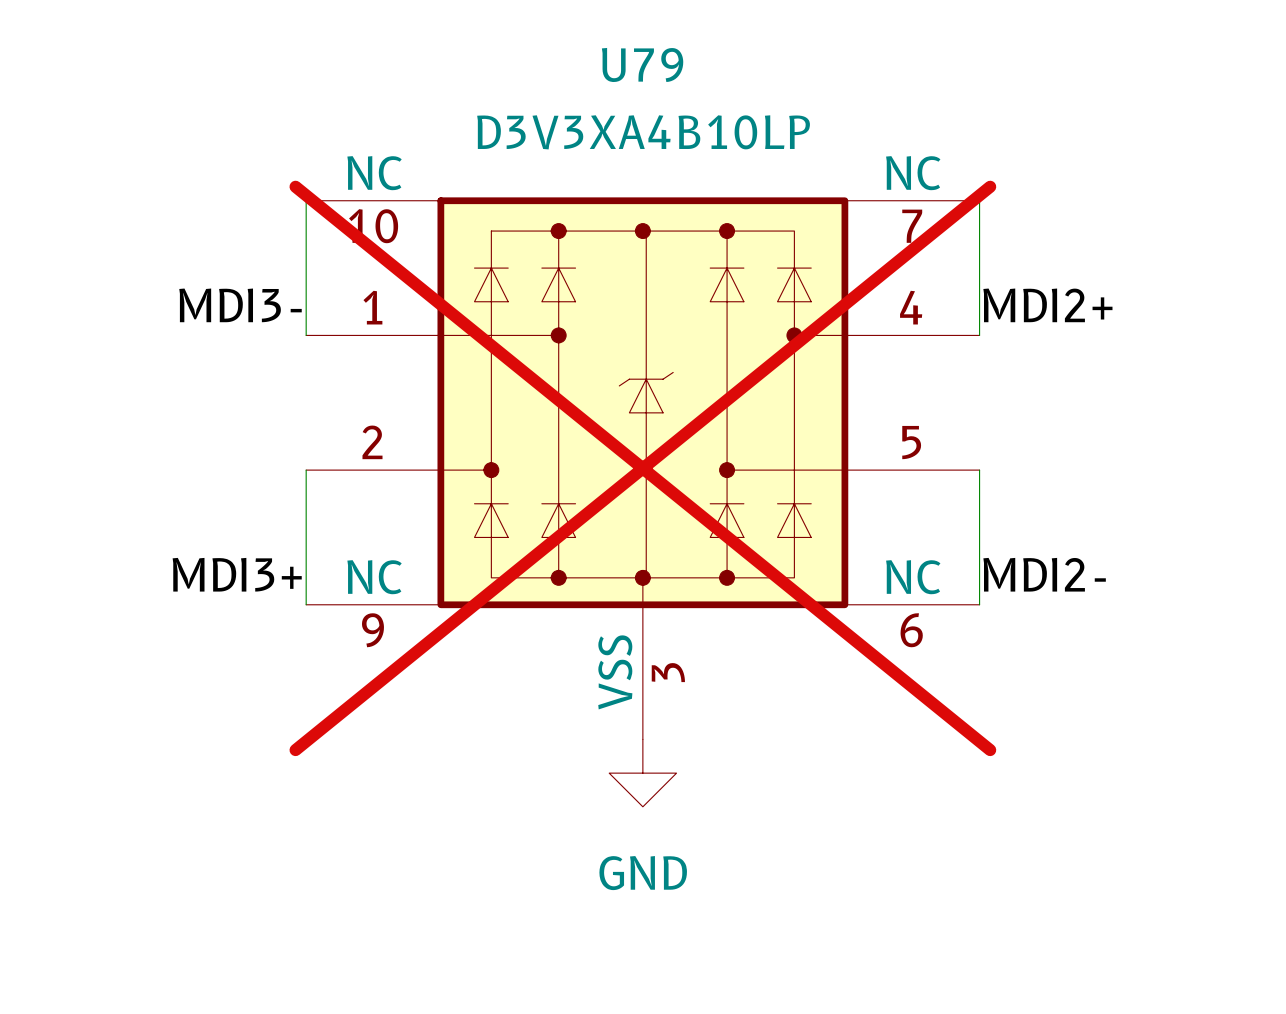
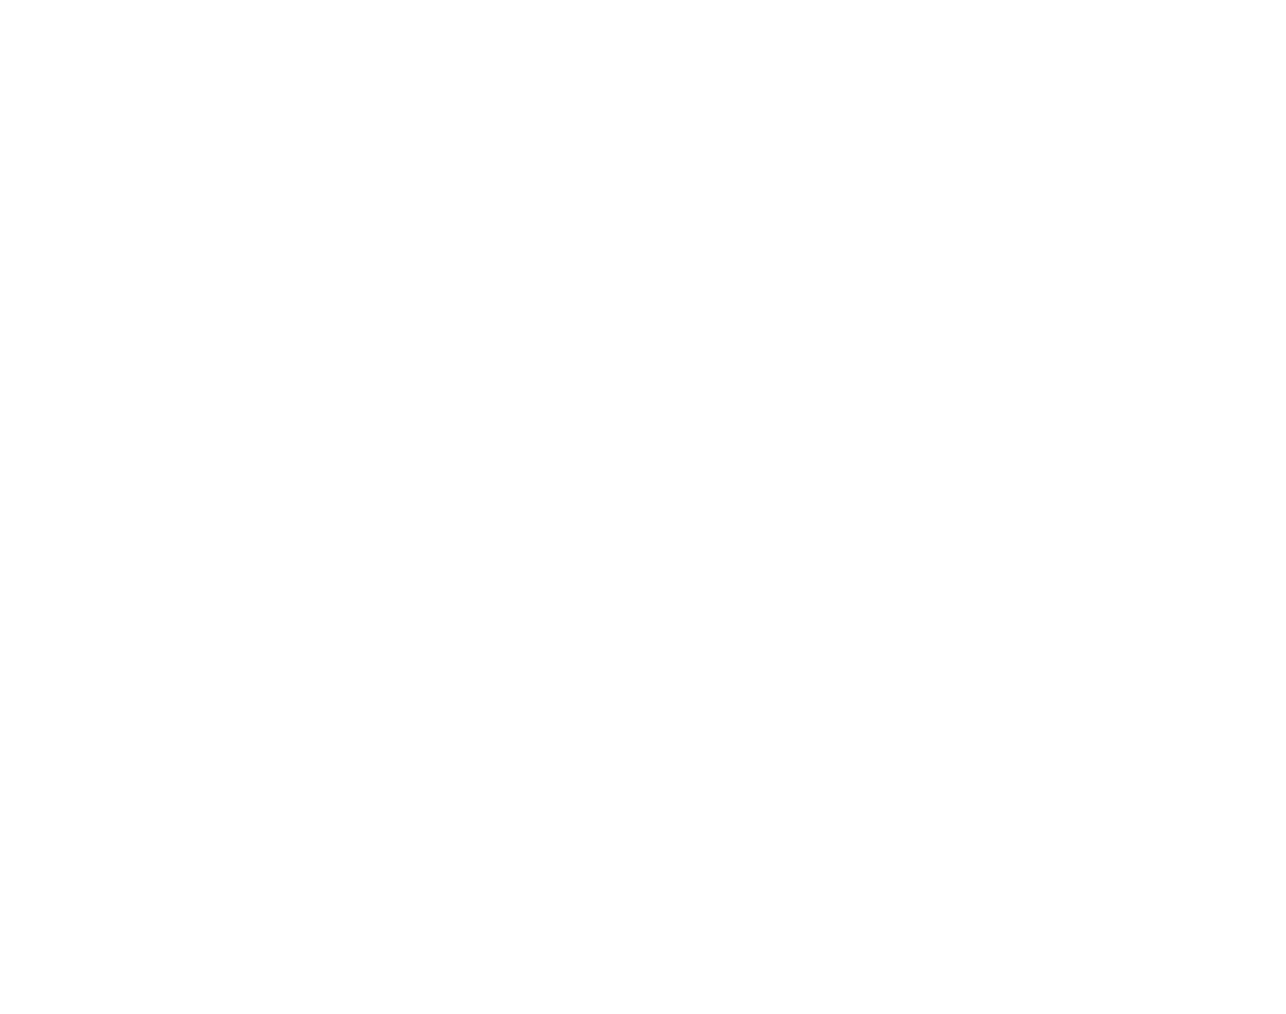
wire: (306, 200) (306, 335) -> none
wire: (979, 200) (979, 335) -> none
label: MDI3- (240, 305) -> none
label: MDI2+ (1047, 305) -> none
U79: D3V3XA4B10LP (642, 468) -> none
wire: (306, 470) (306, 604) -> none
wire: (979, 470) (979, 604) -> none
label: MDI3+ (237, 574) -> none
label: MDI2- (1044, 574) -> none
power symbol: GND (642, 773) -> none

